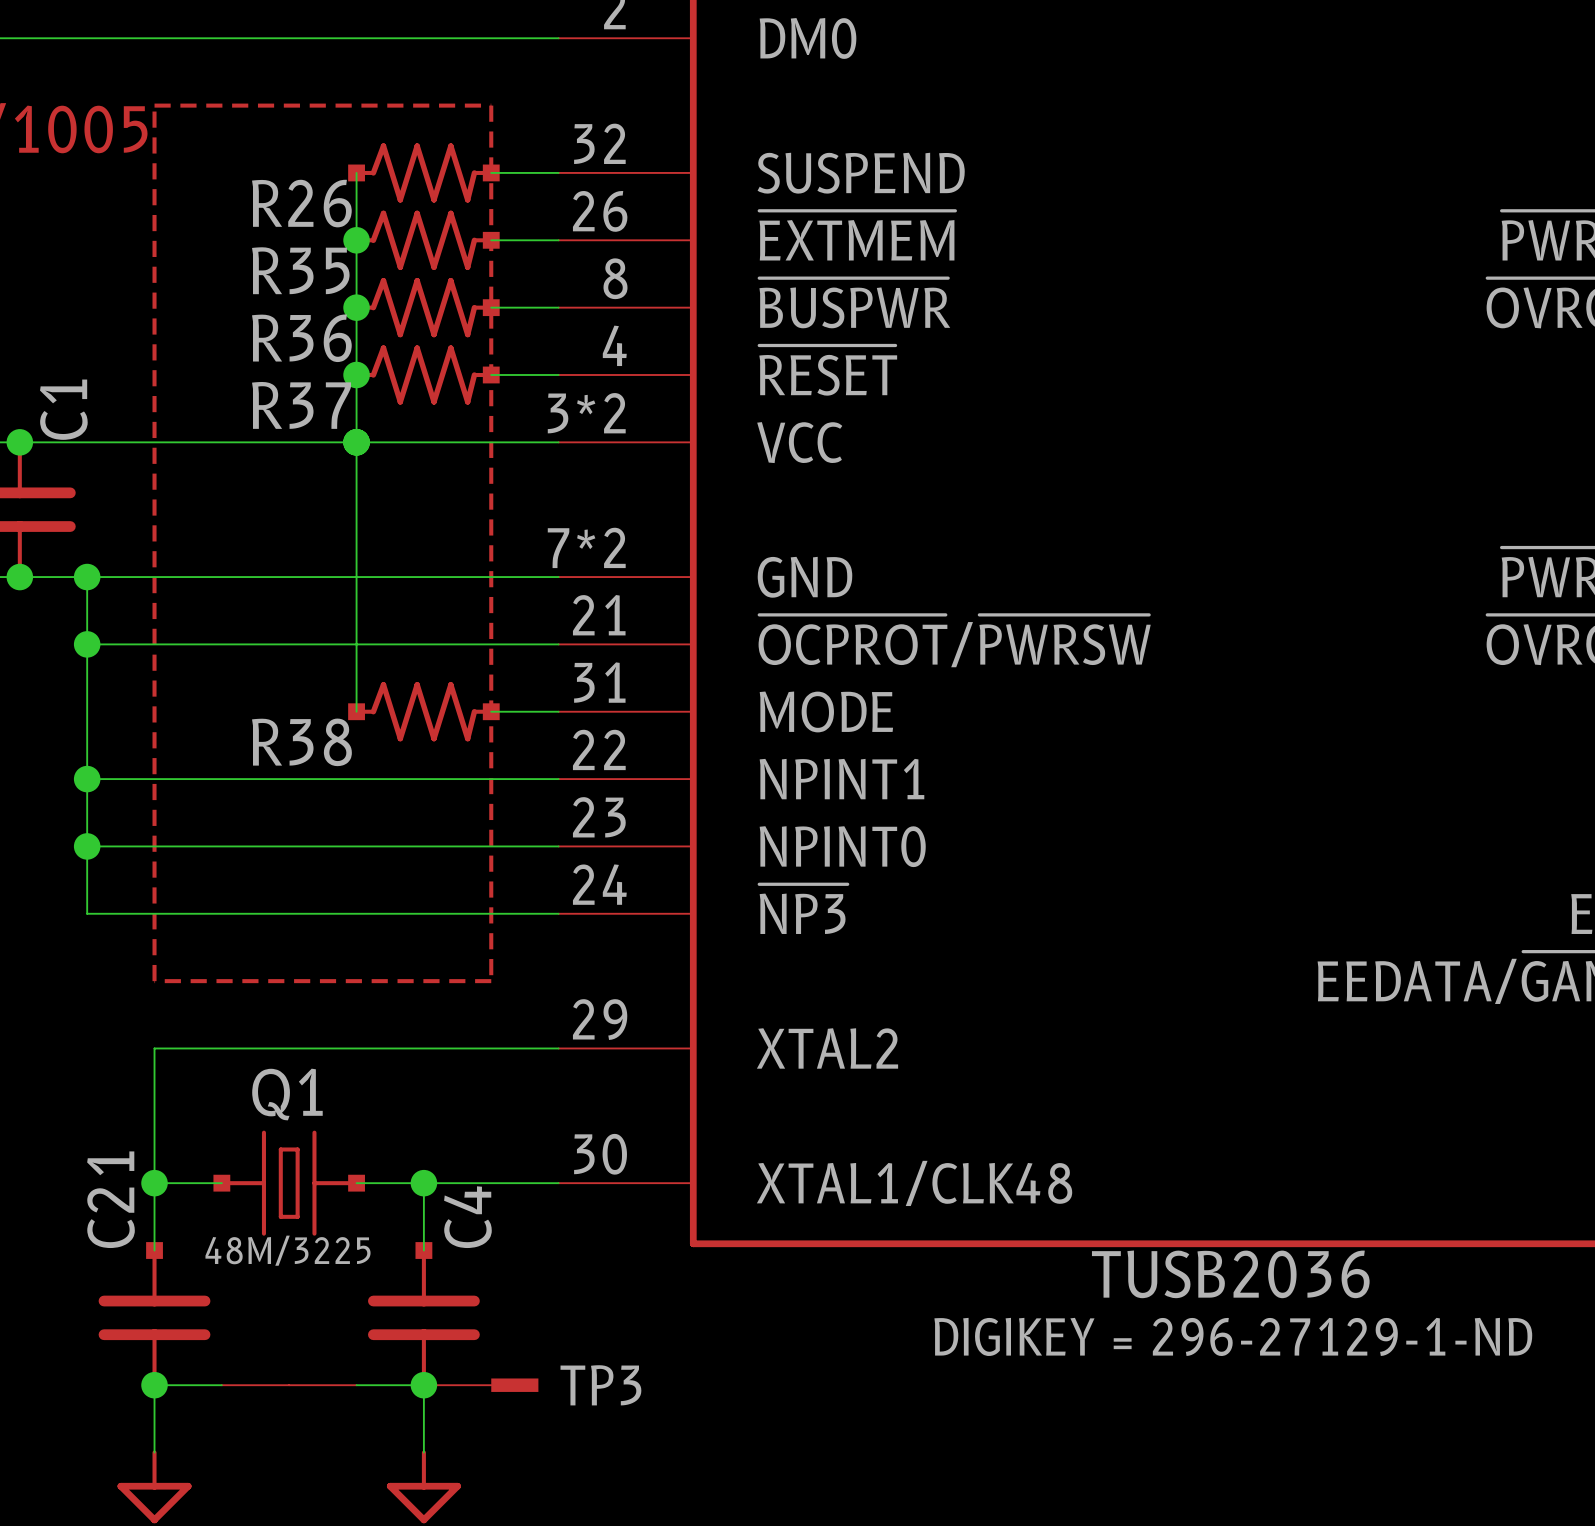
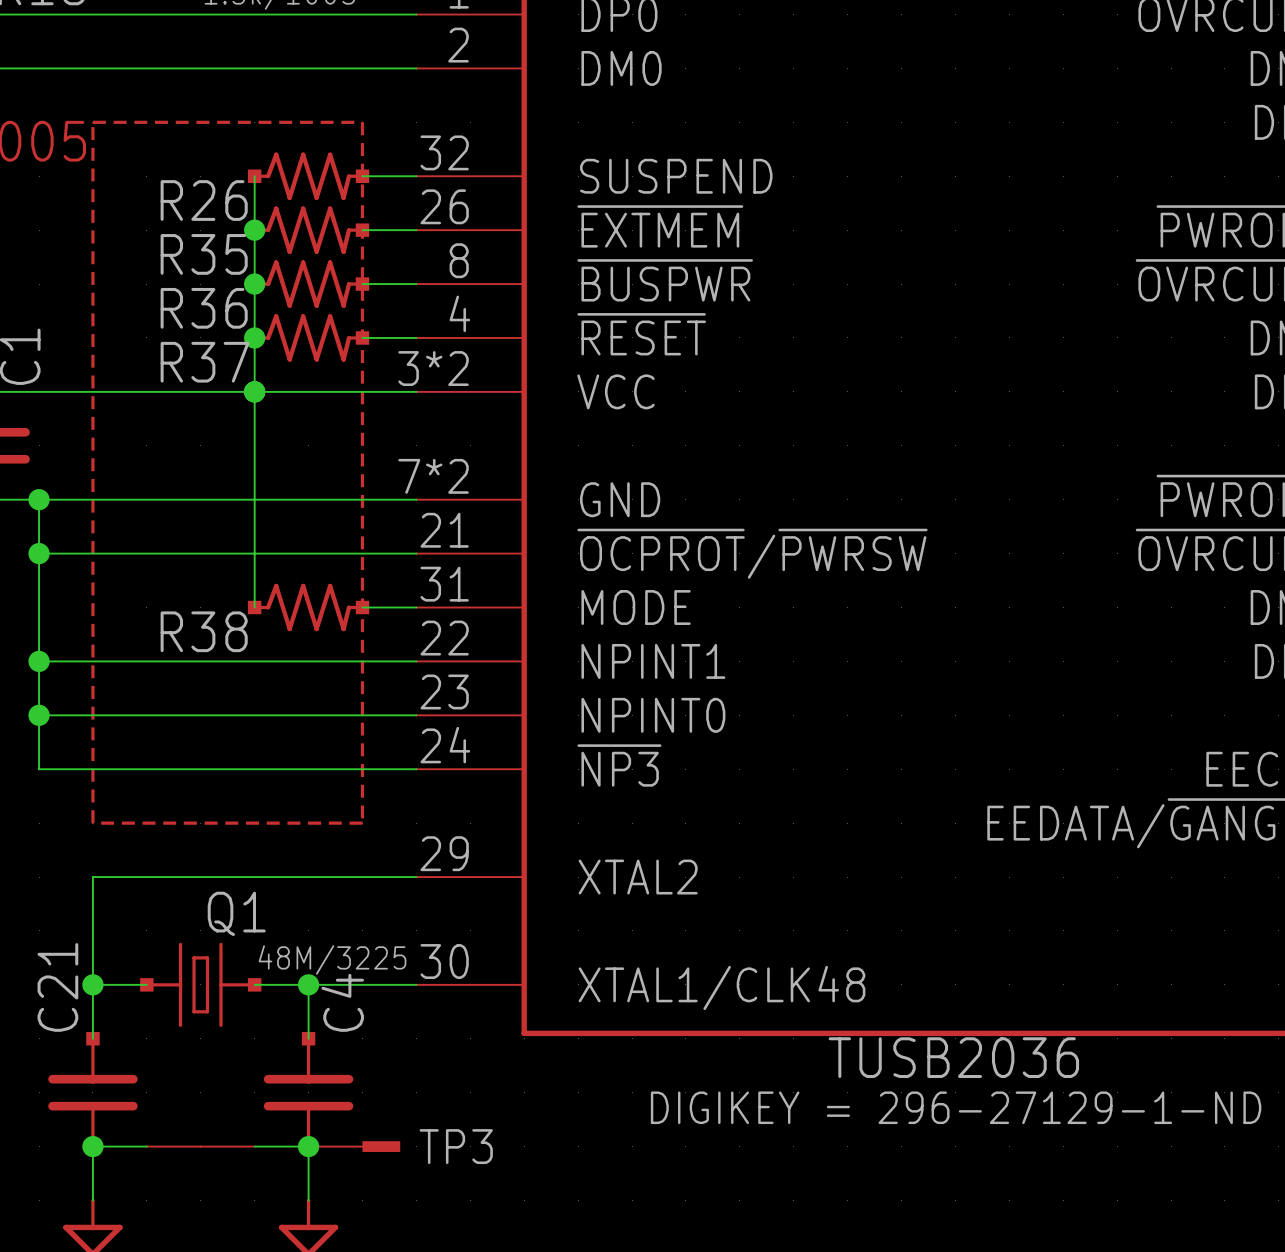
Q1 name position: Q1 (287, 1094) -> Q1 (236, 913)
Q1 value position: 48M/3225 (288, 1250) -> 48M/3225 (332, 959)

